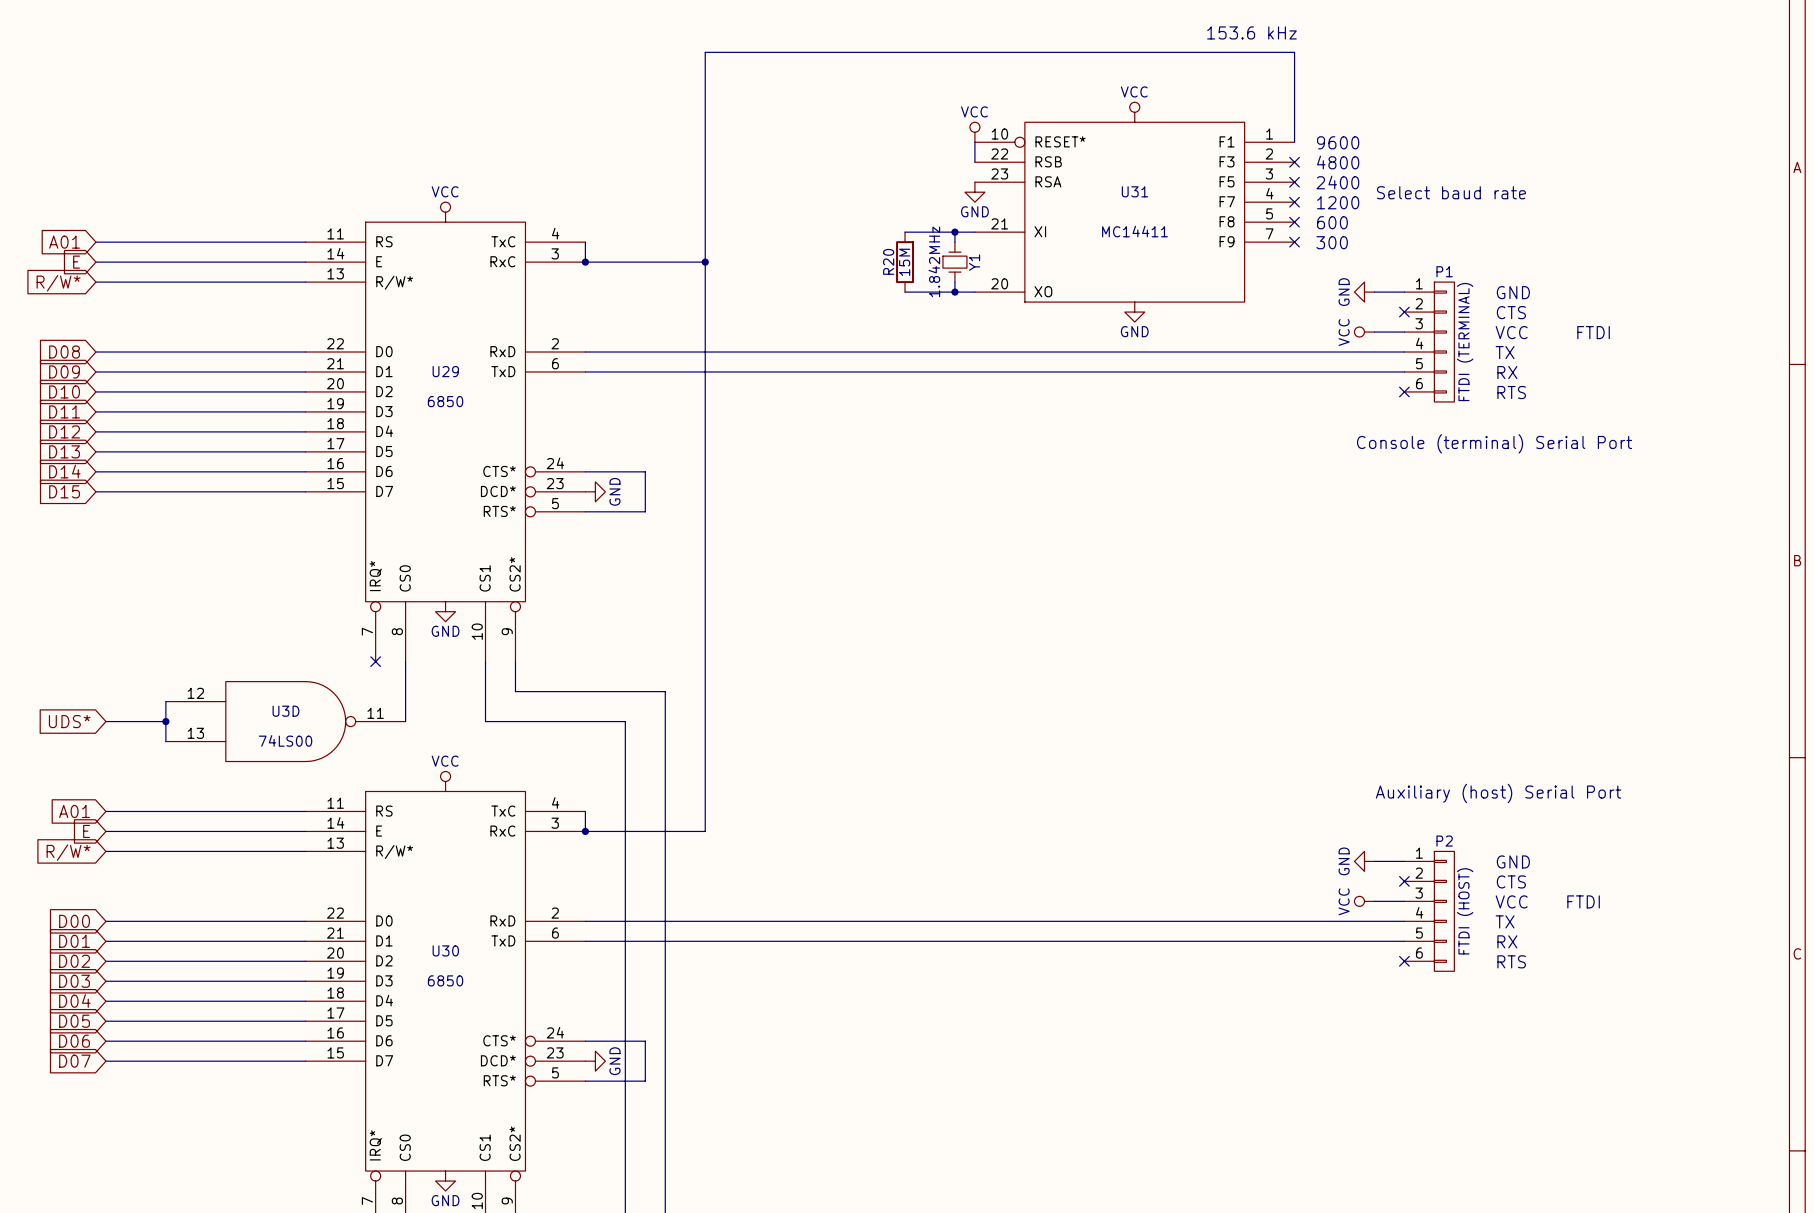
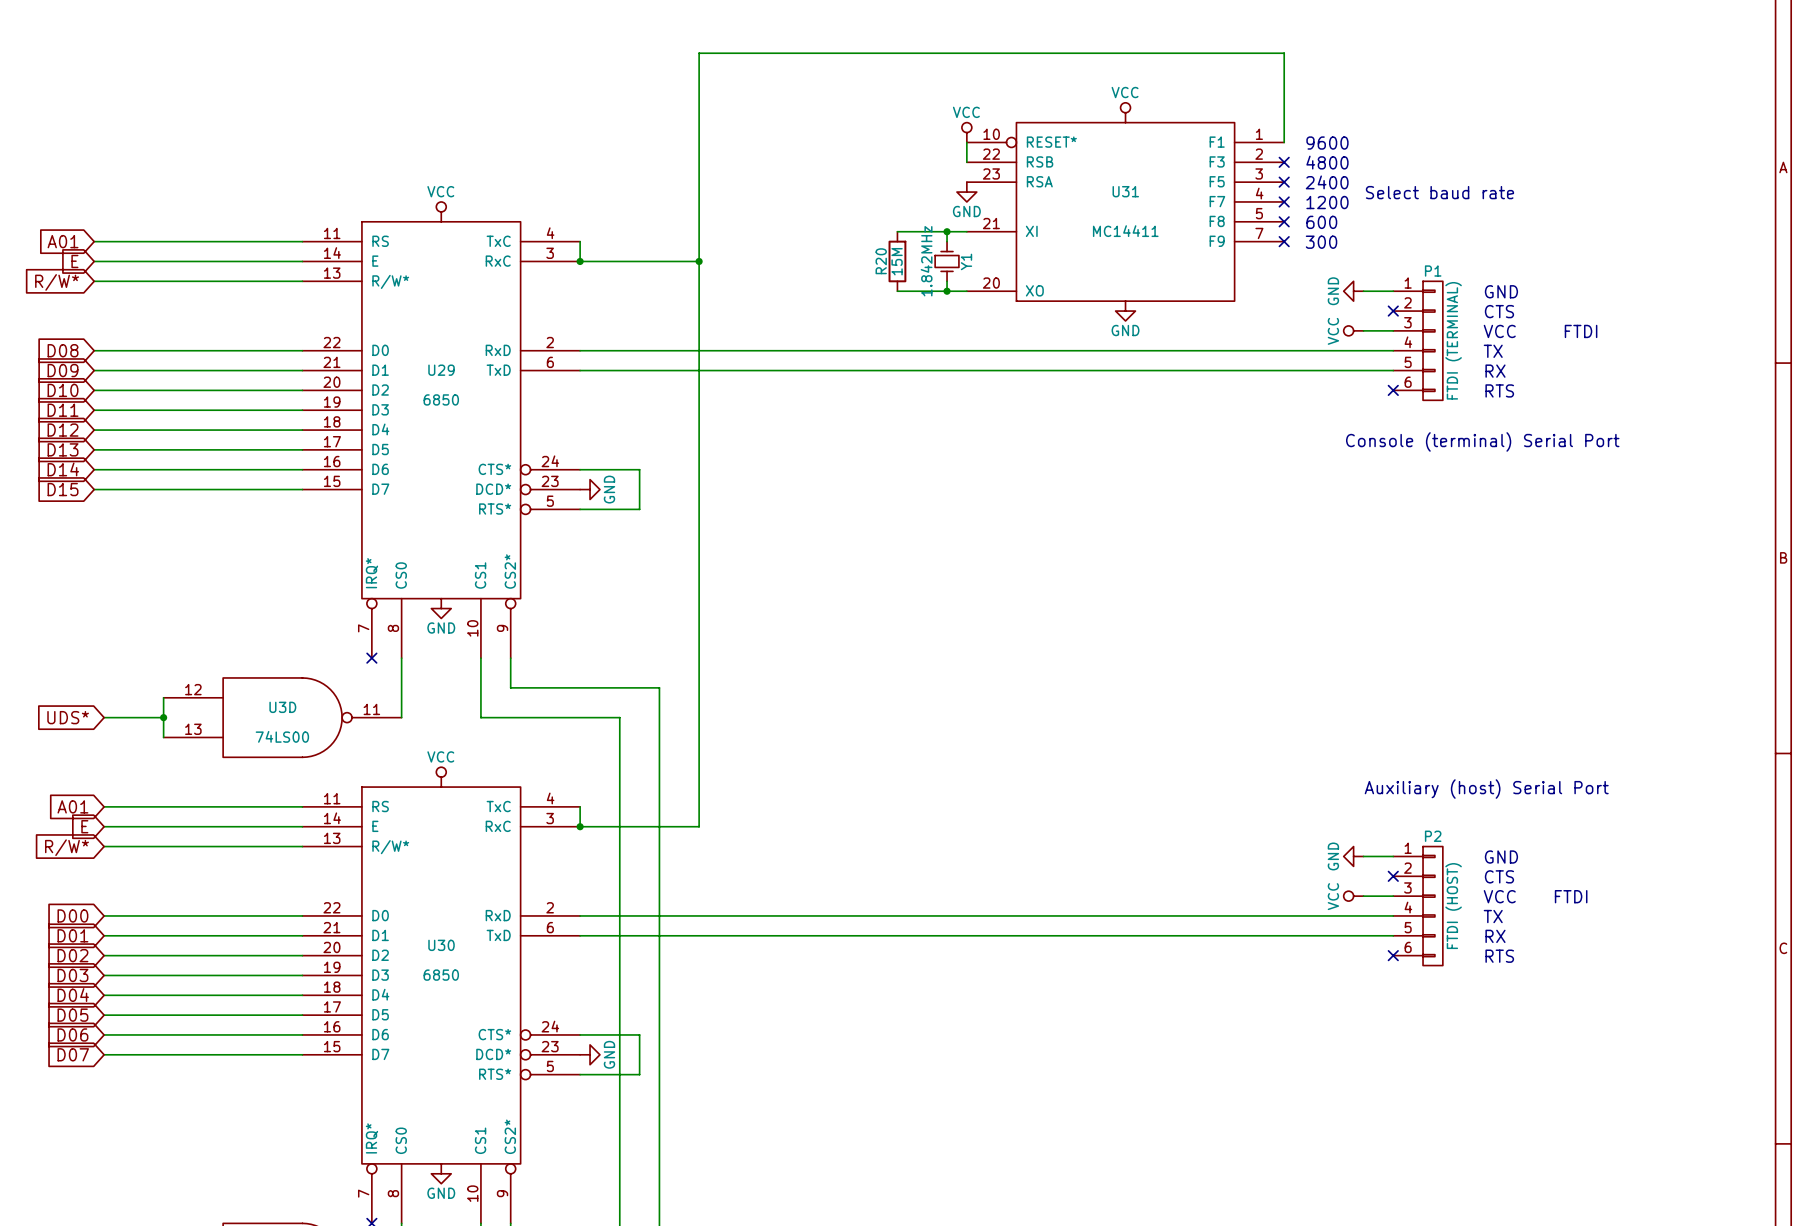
text: 153.6 kHz (1251, 32) -> none

